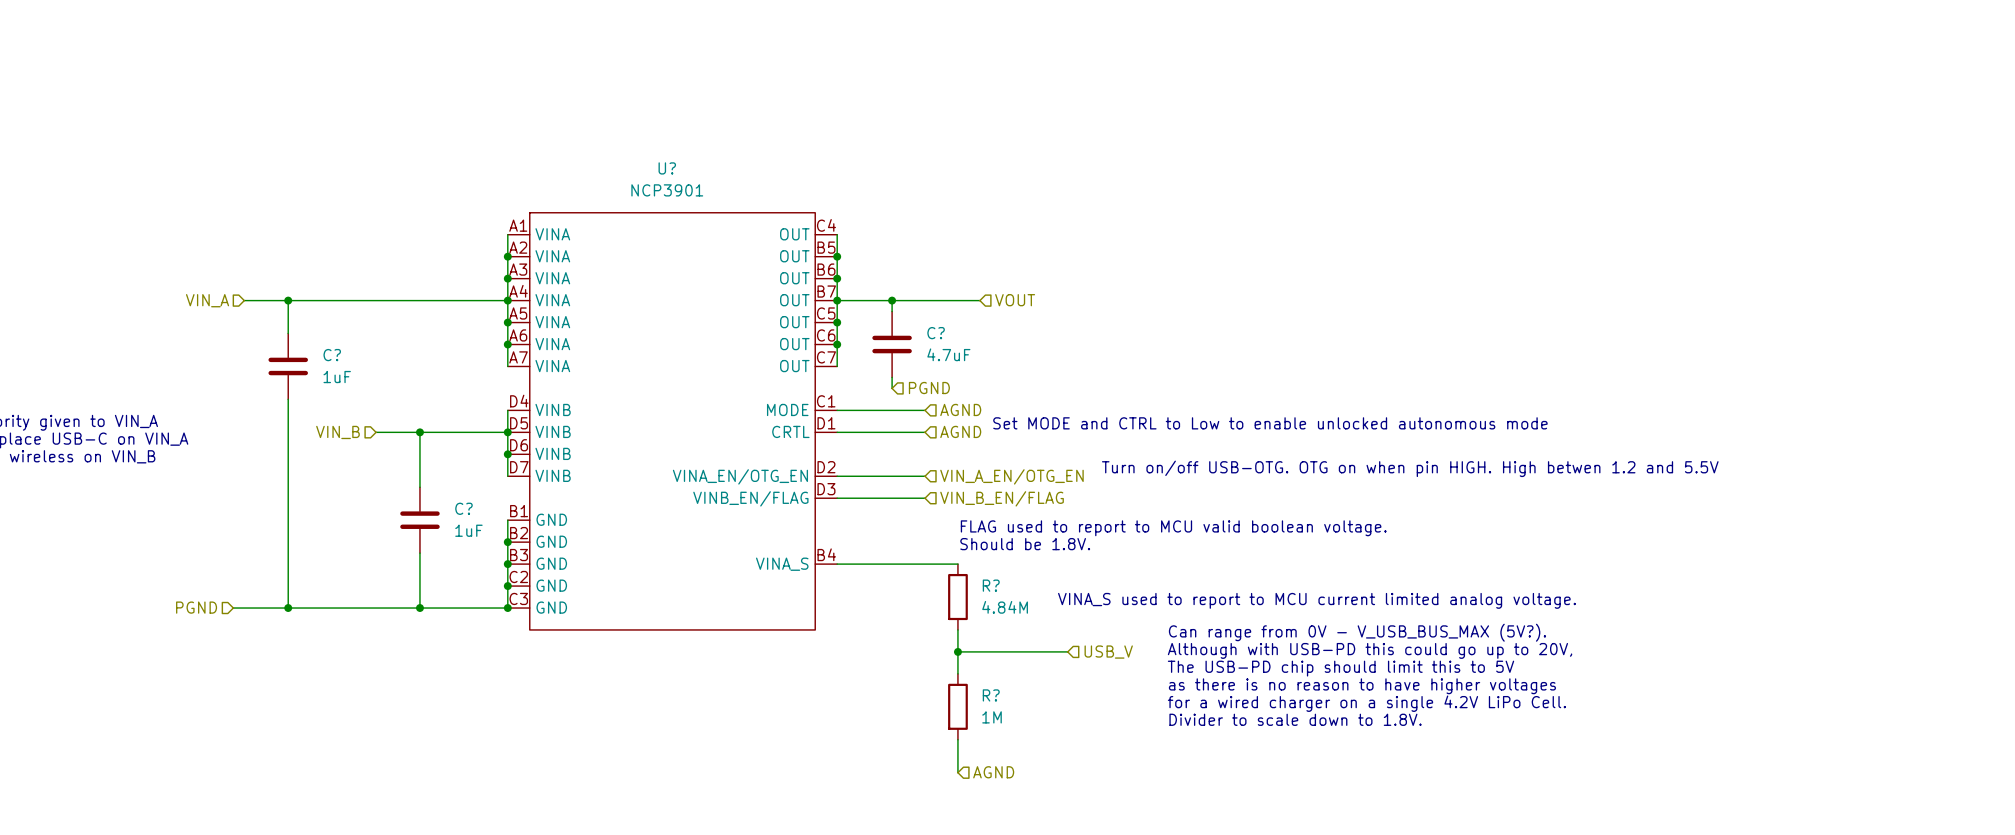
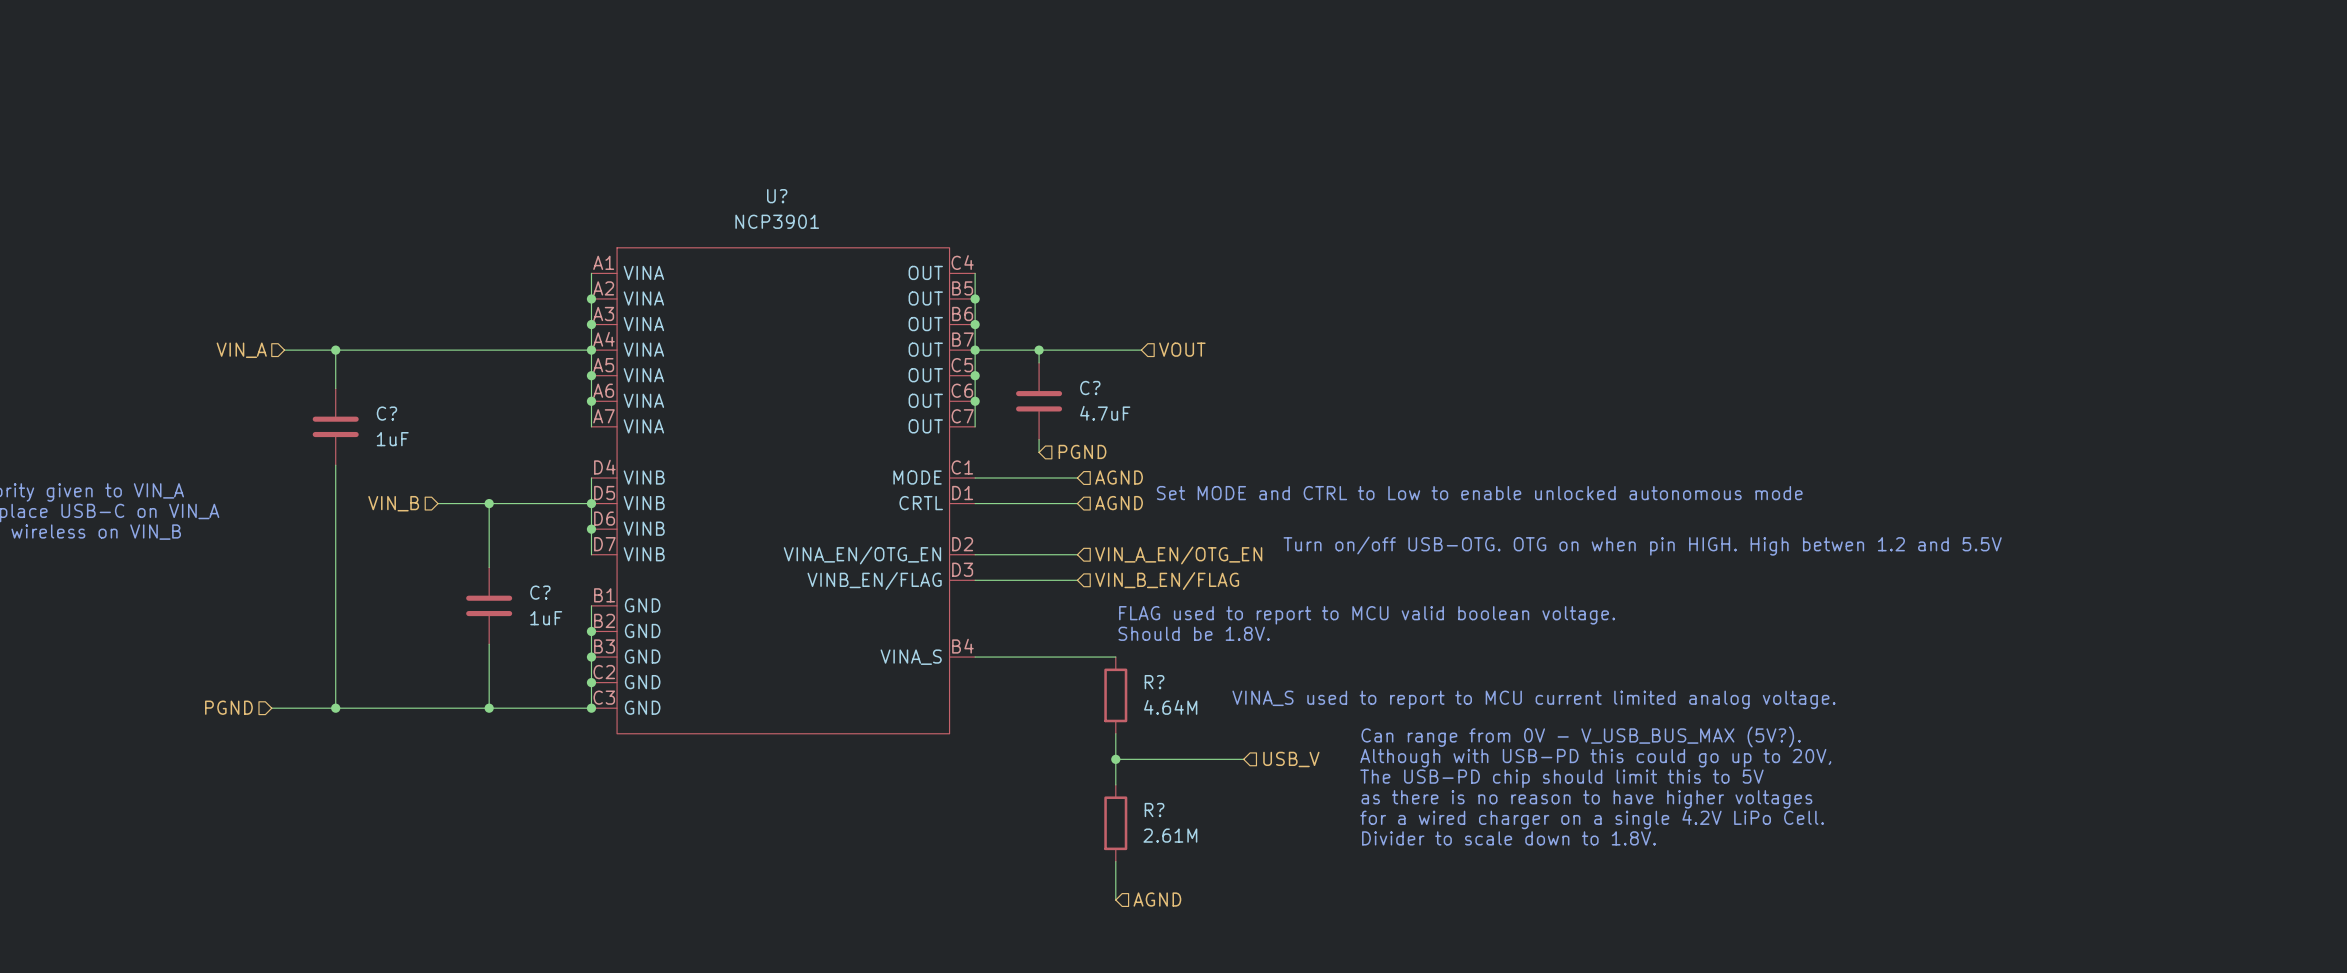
R? value: 4.84M (1005, 607) -> 4.64M (1170, 707)
R? value: 1M (992, 717) -> 2.61M (1170, 835)

